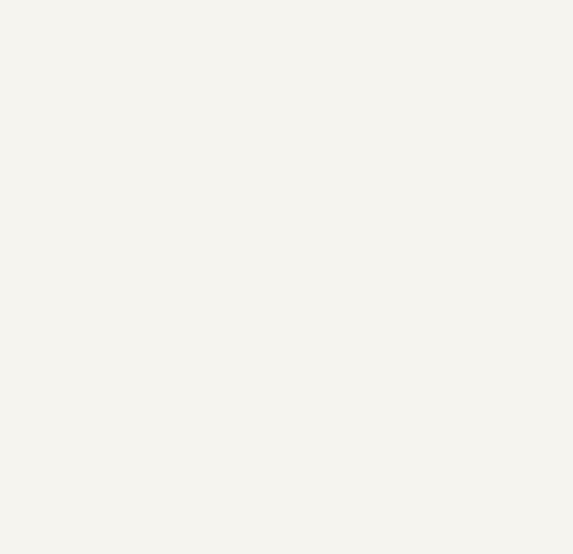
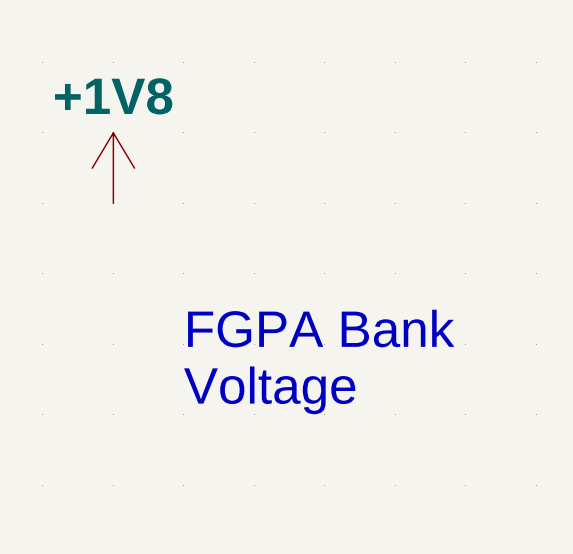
power symbol: none -> +1V8 (113, 168)
text: none -> FGPA Bank (321, 328)
text: none -> Voltage (269, 390)

